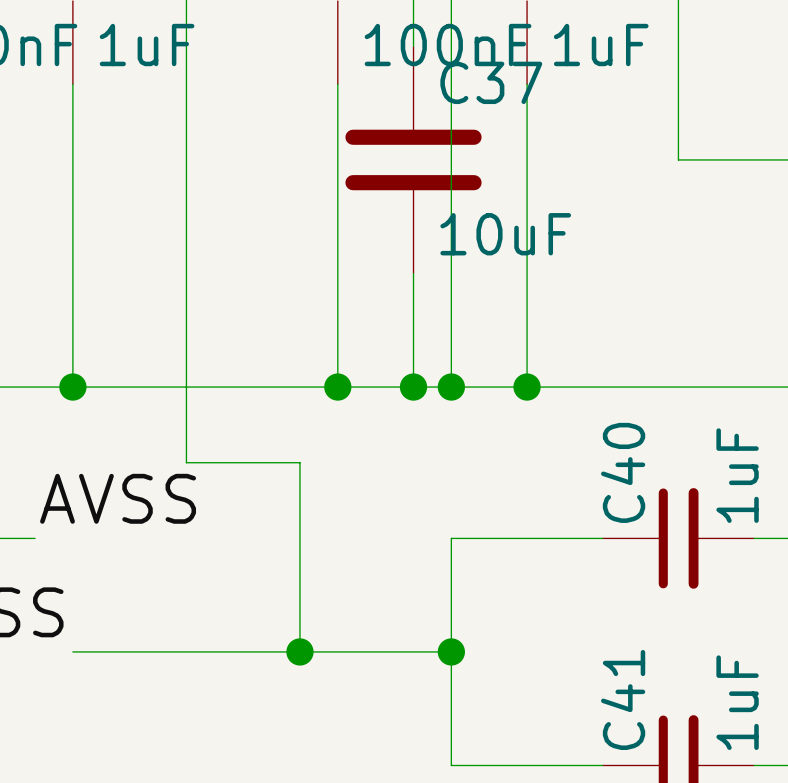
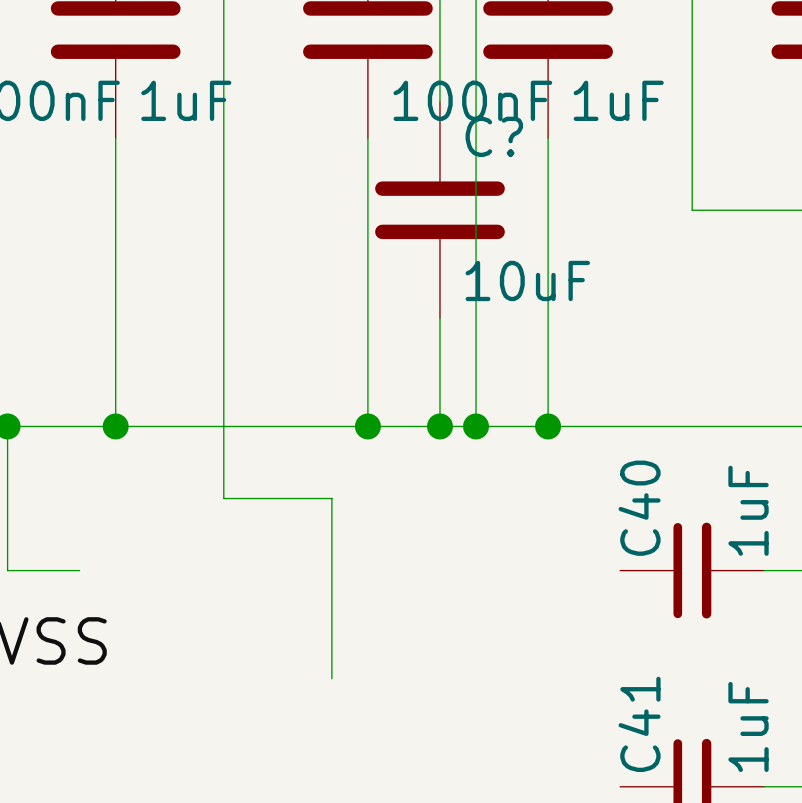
C37 name: C37 (491, 82) -> C? (494, 136)
label: AVSS (118, 498) -> none
wire: (602, 538) (451, 538) (451, 765) (602, 765) -> none
wire: (72, 651) (451, 651) -> none
junction: (299, 651) -> none
junction: (451, 651) -> none

